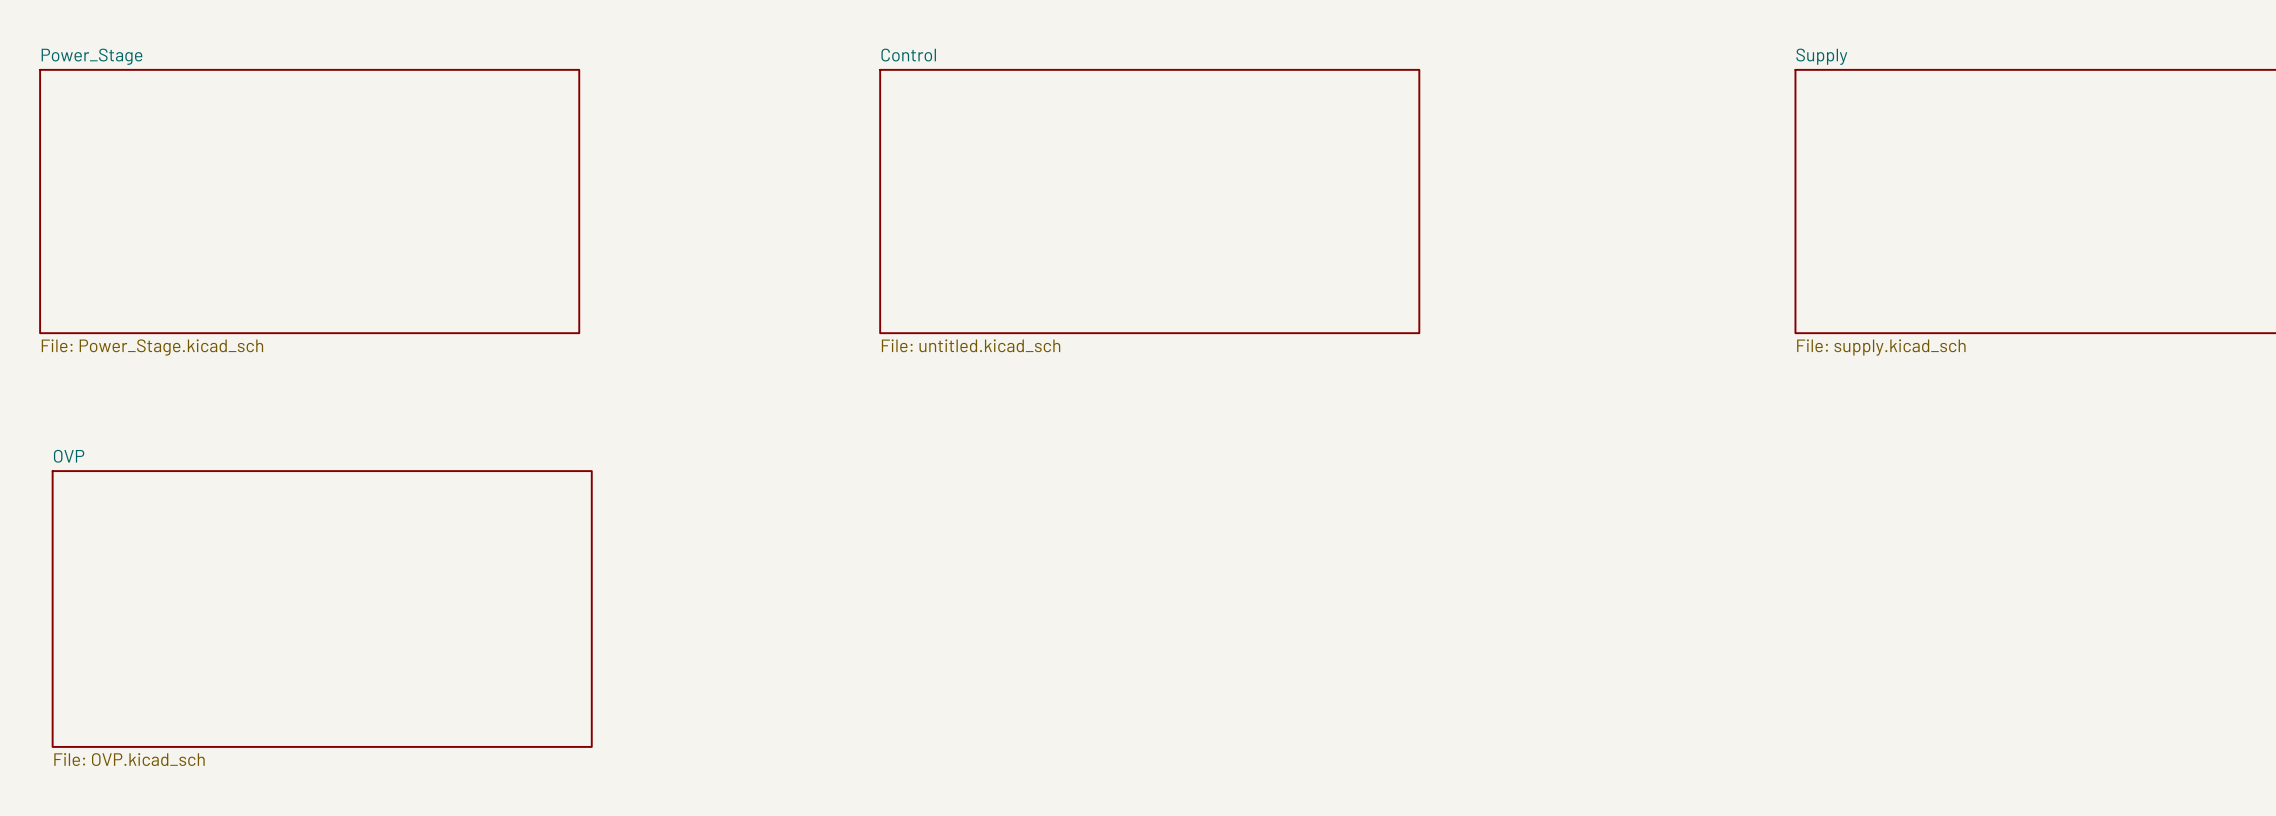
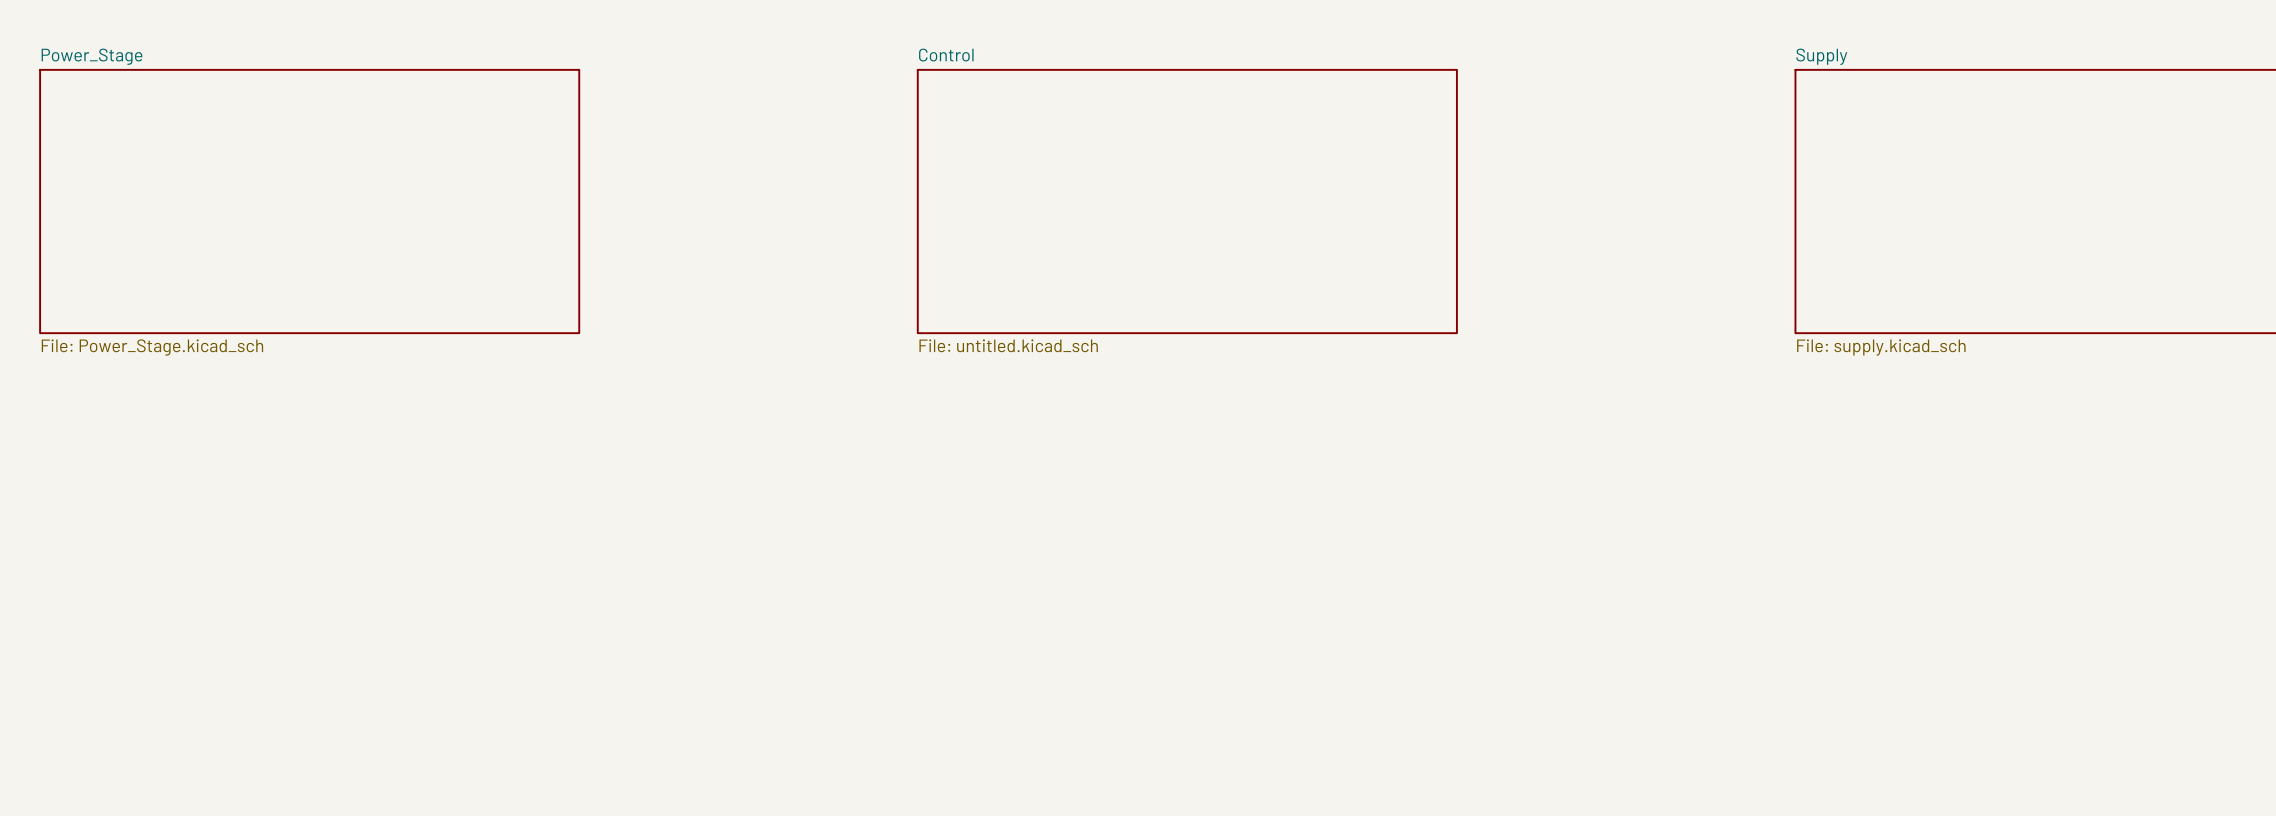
sheet Control position: (1149, 201) -> (1187, 201)
sheet OVP: File: OVP.kicad_sch (322, 609) -> none

